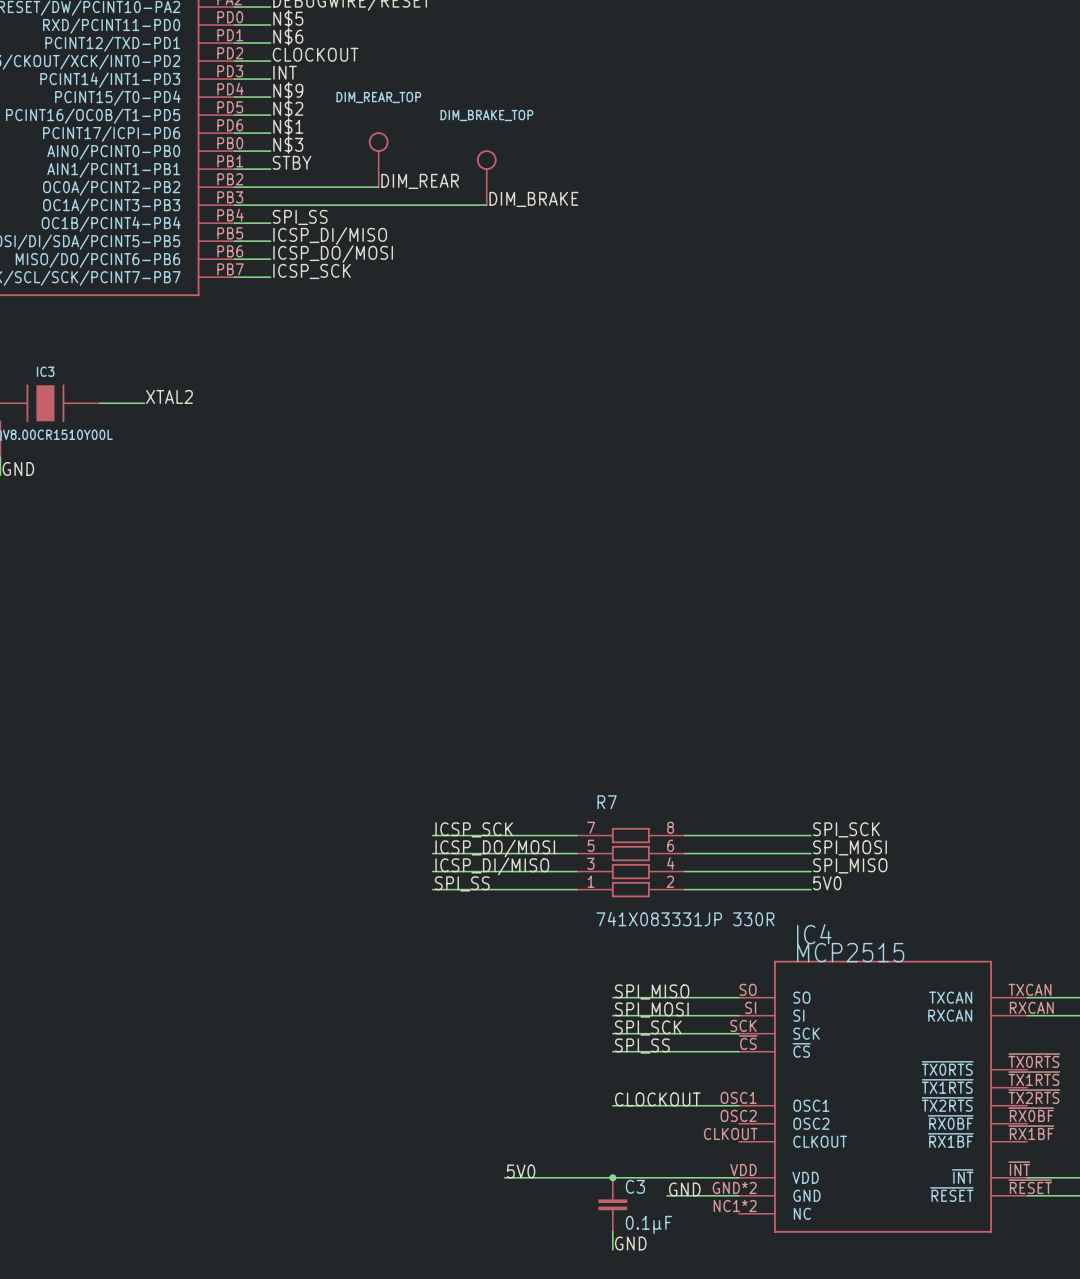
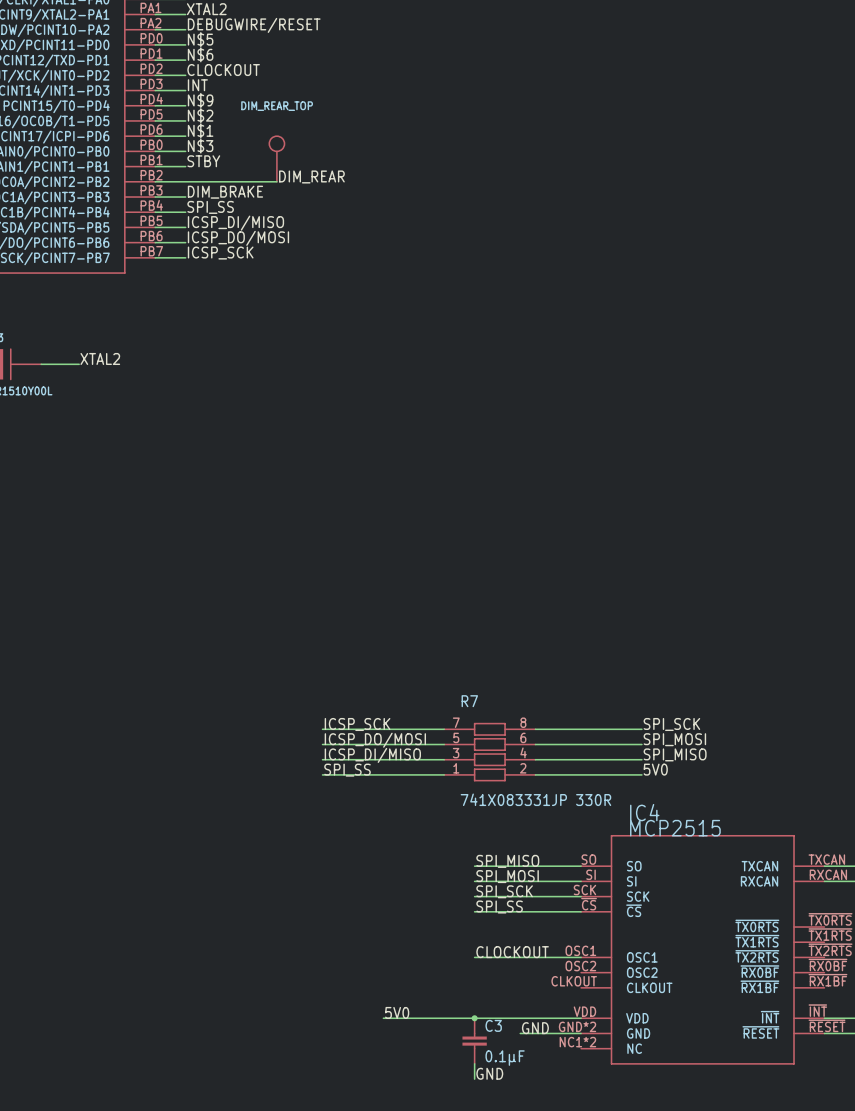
DIM_BRAKE_TOP: (486, 177) -> none
label: none -> DIM_BRAKE (225, 192)
label: DIM_BRAKE (533, 199) -> none
wire: (270, 205) (486, 205) -> none

